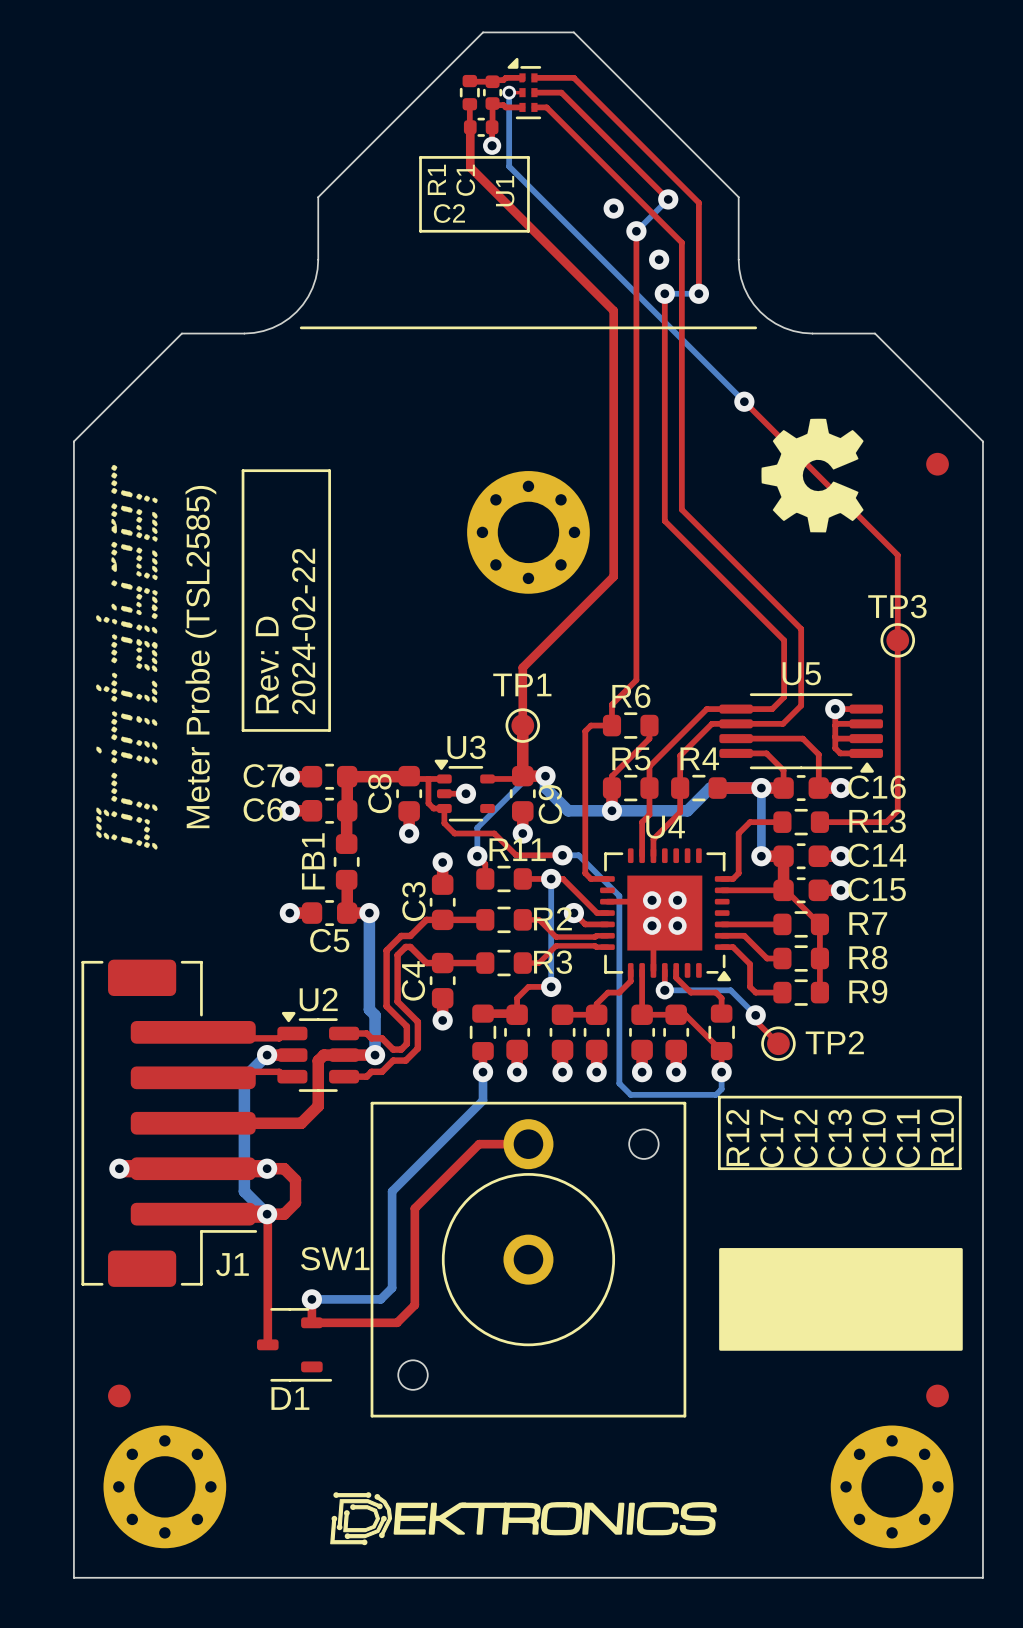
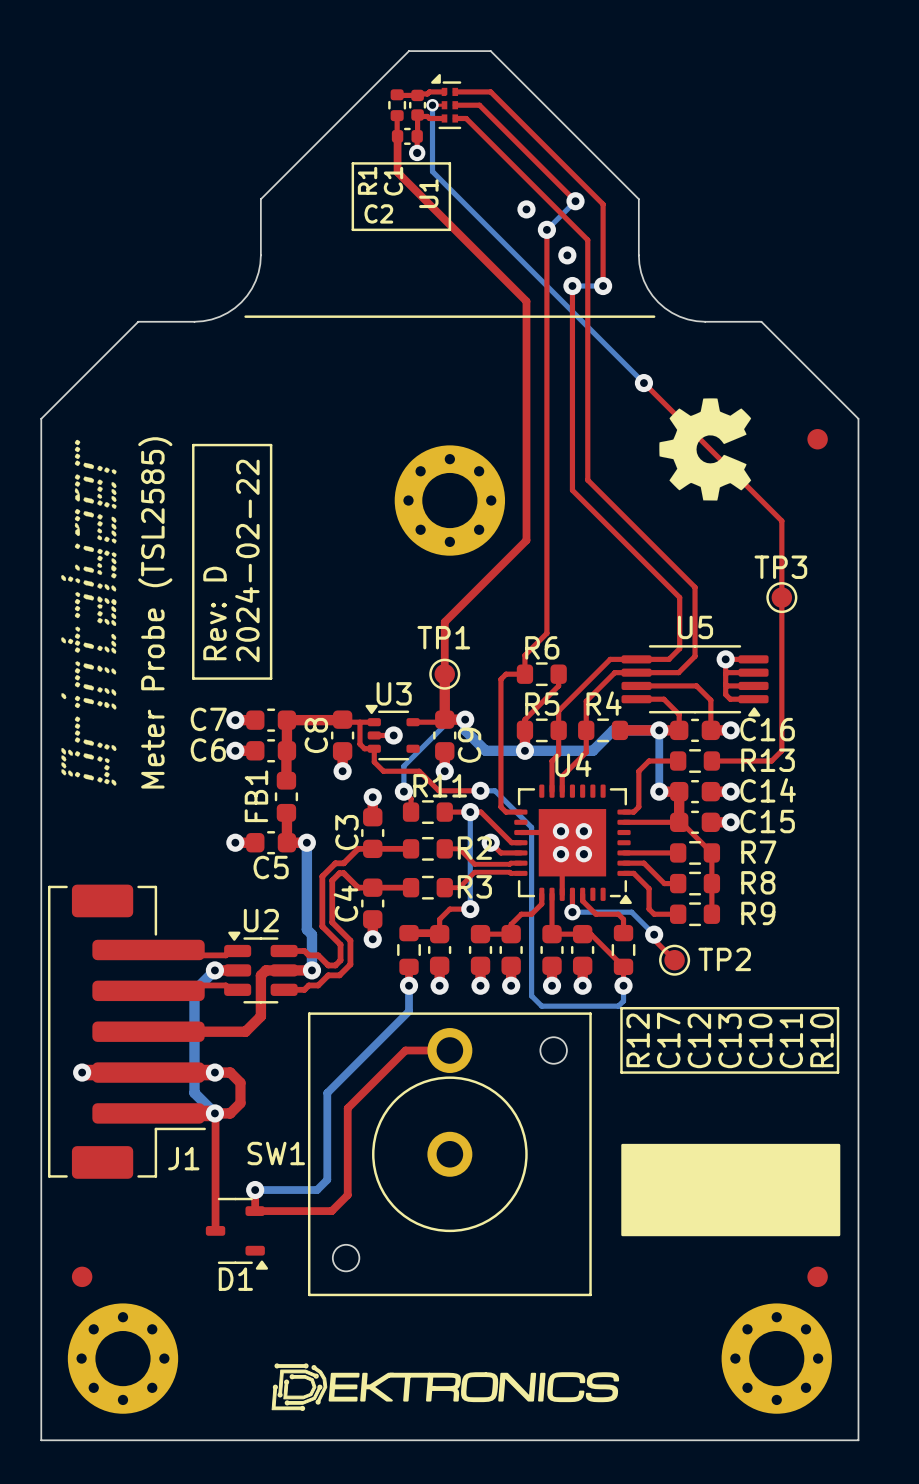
D1 footprint: [257, 1308, 333, 1382] -> [205, 1197, 269, 1270]

